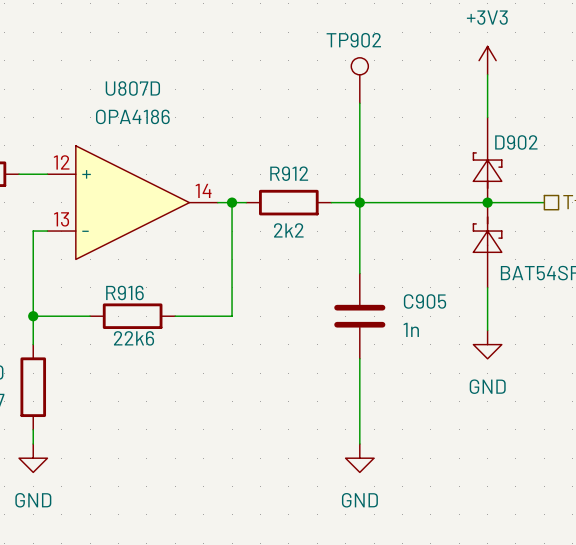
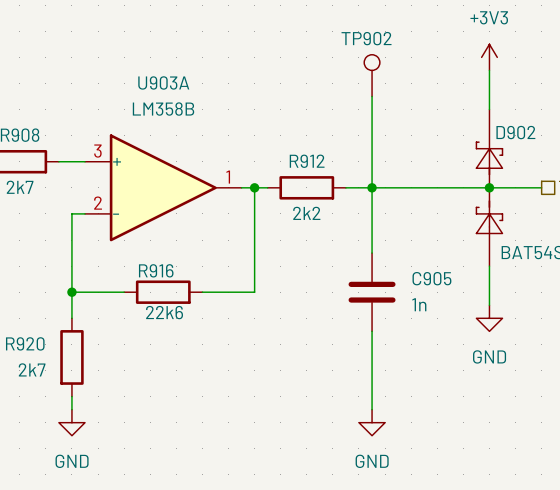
U807D: OPA4186 (132, 202) -> none
U903A: none -> LM358B (163, 187)

